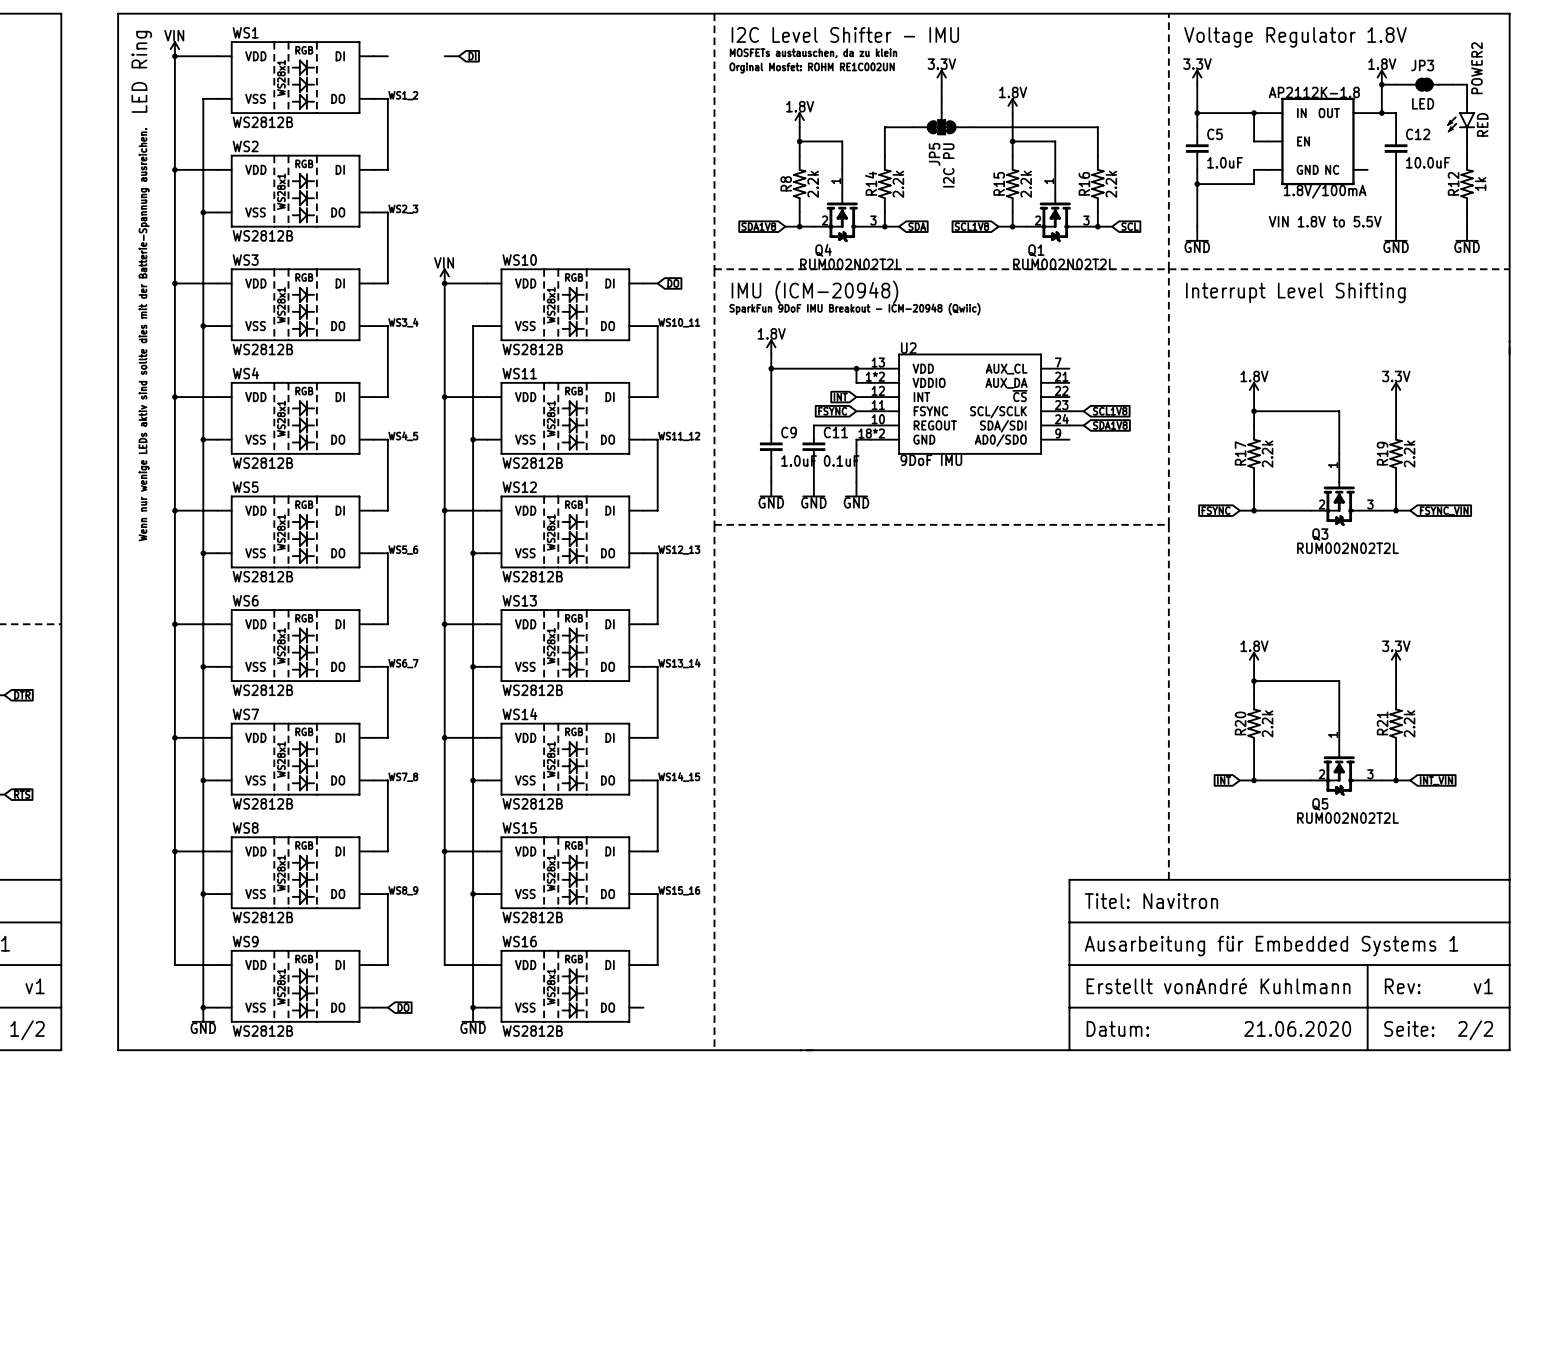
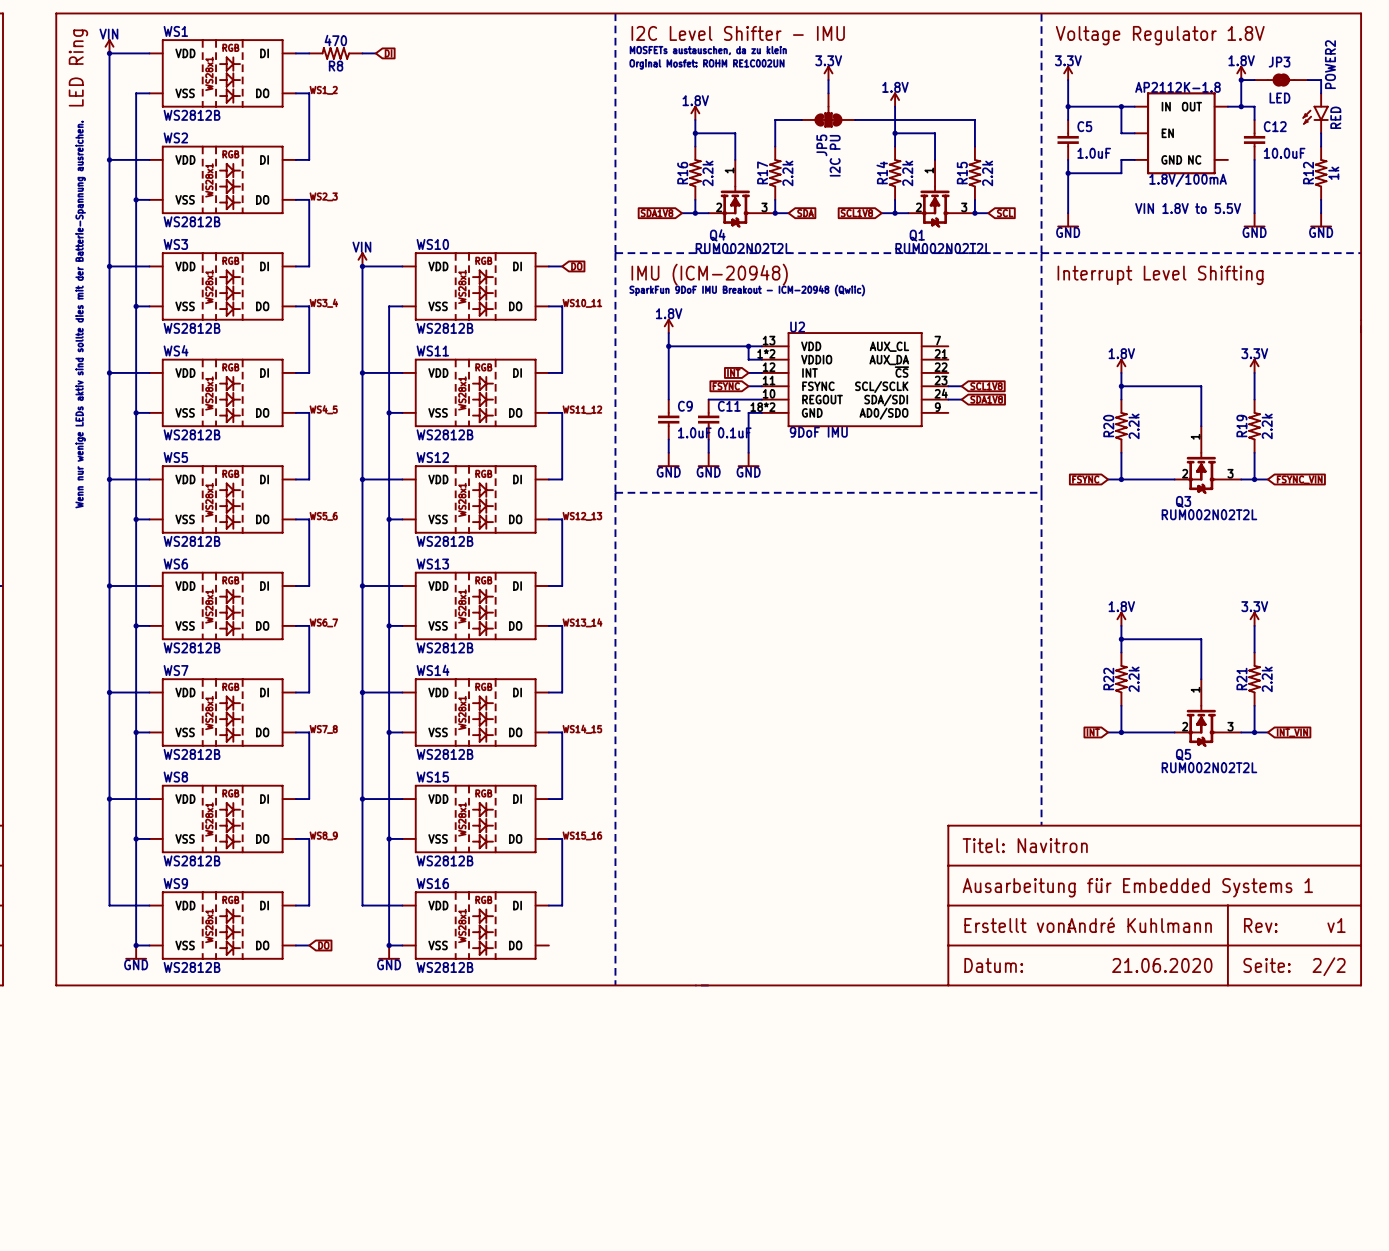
R8: none -> 470 (335, 53)
R8 name: R8 (786, 183) -> R16 (682, 173)
R14 name: R14 (871, 183) -> R17 (762, 172)
R15 name: R15 (999, 183) -> R14 (882, 172)
R16 name: R16 (1084, 183) -> R15 (962, 173)
R17 name: R17 (1240, 453) -> R20 (1108, 426)
R20 name: R20 (1240, 723) -> R22 (1108, 679)

